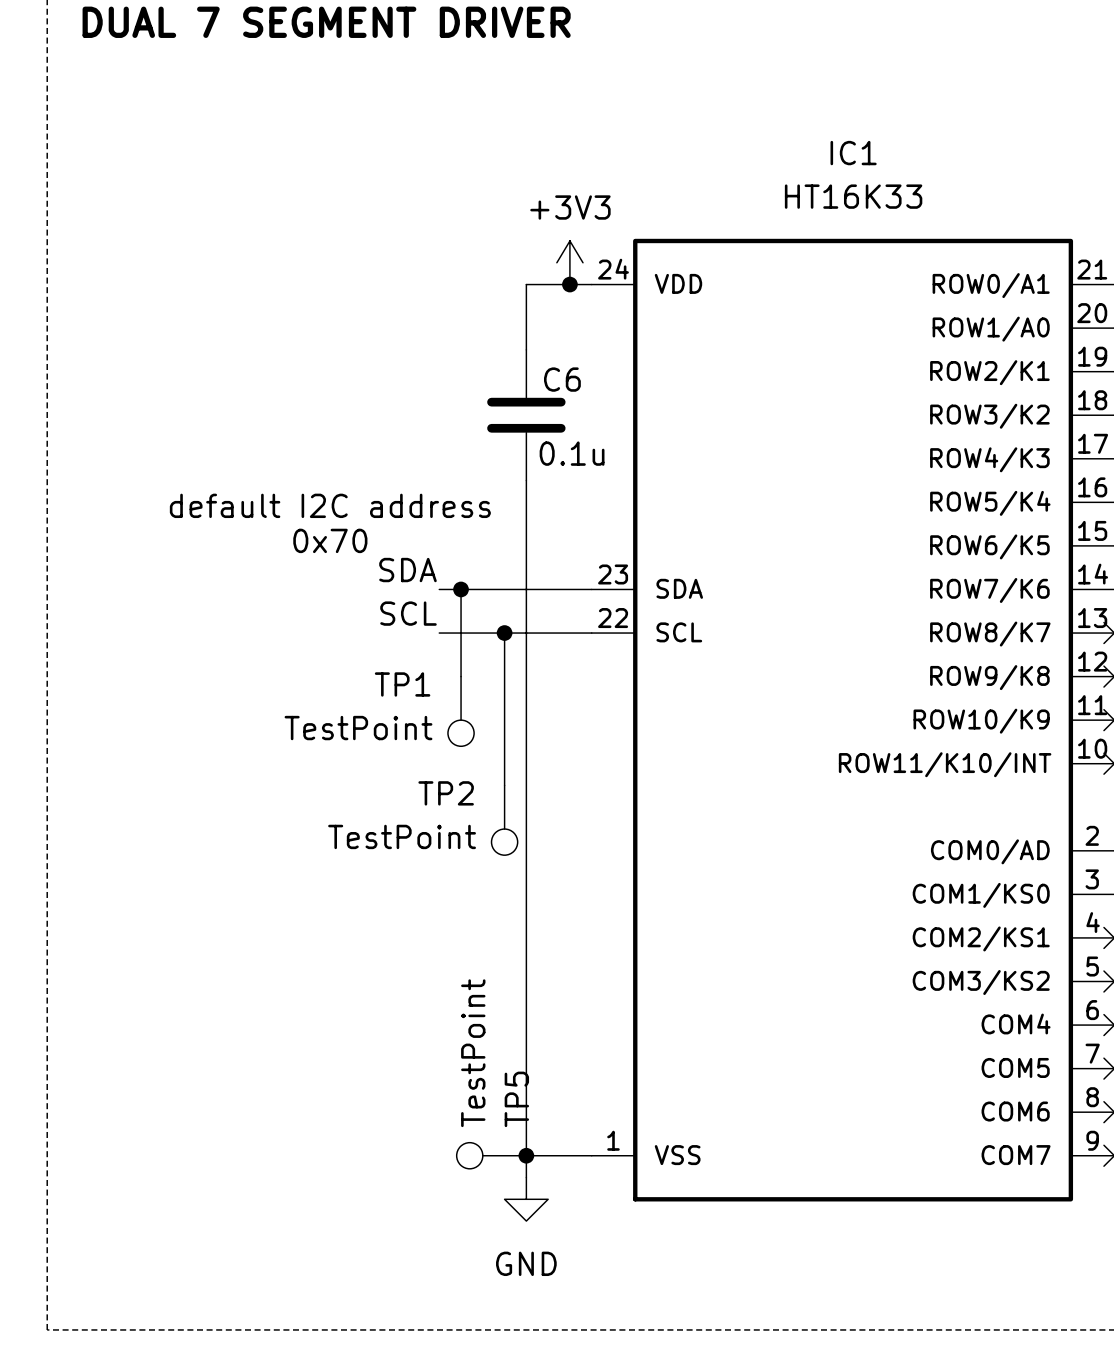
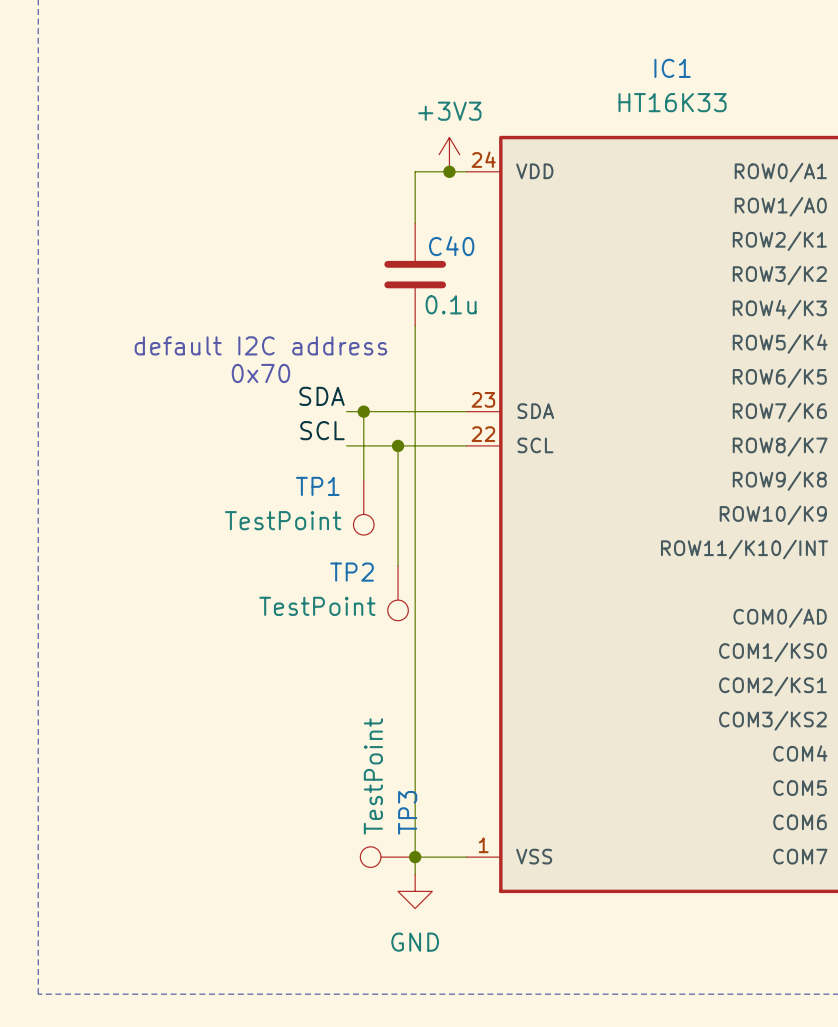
C6 name: C6 (562, 379) -> C40 (451, 246)
TP5 name: TP5 (516, 1099) -> TP3 (407, 812)

